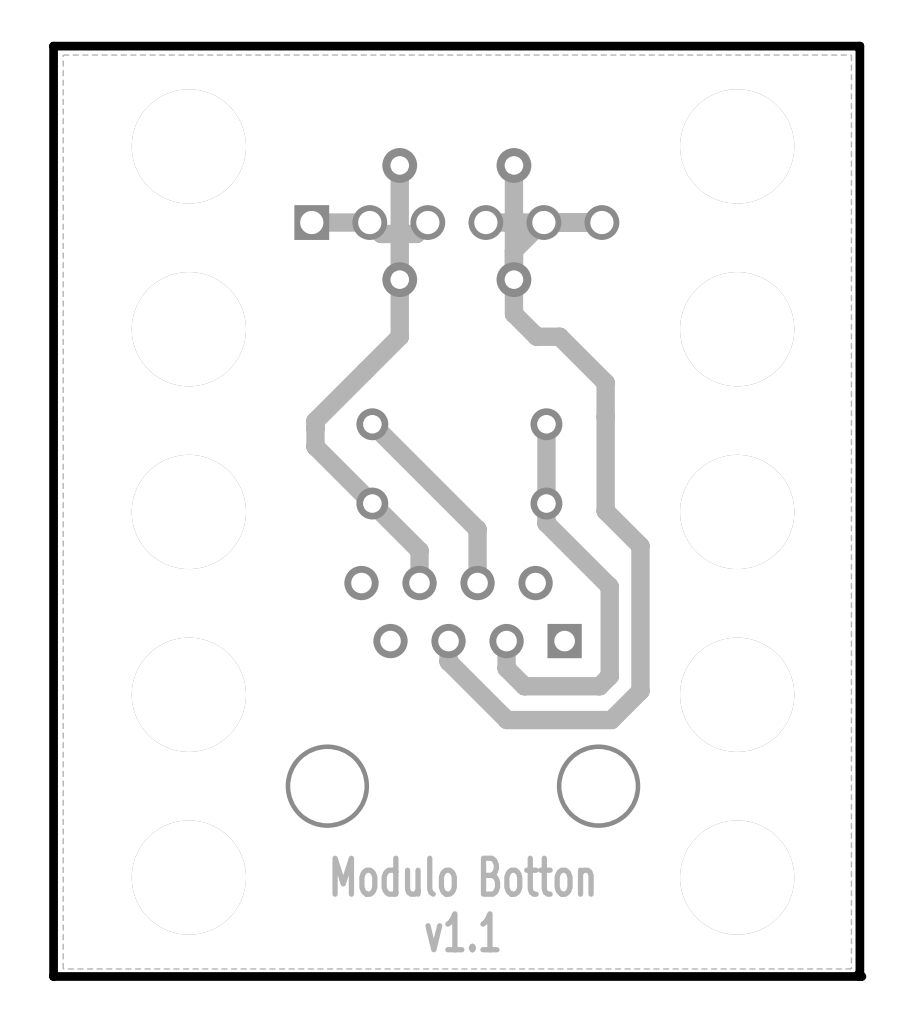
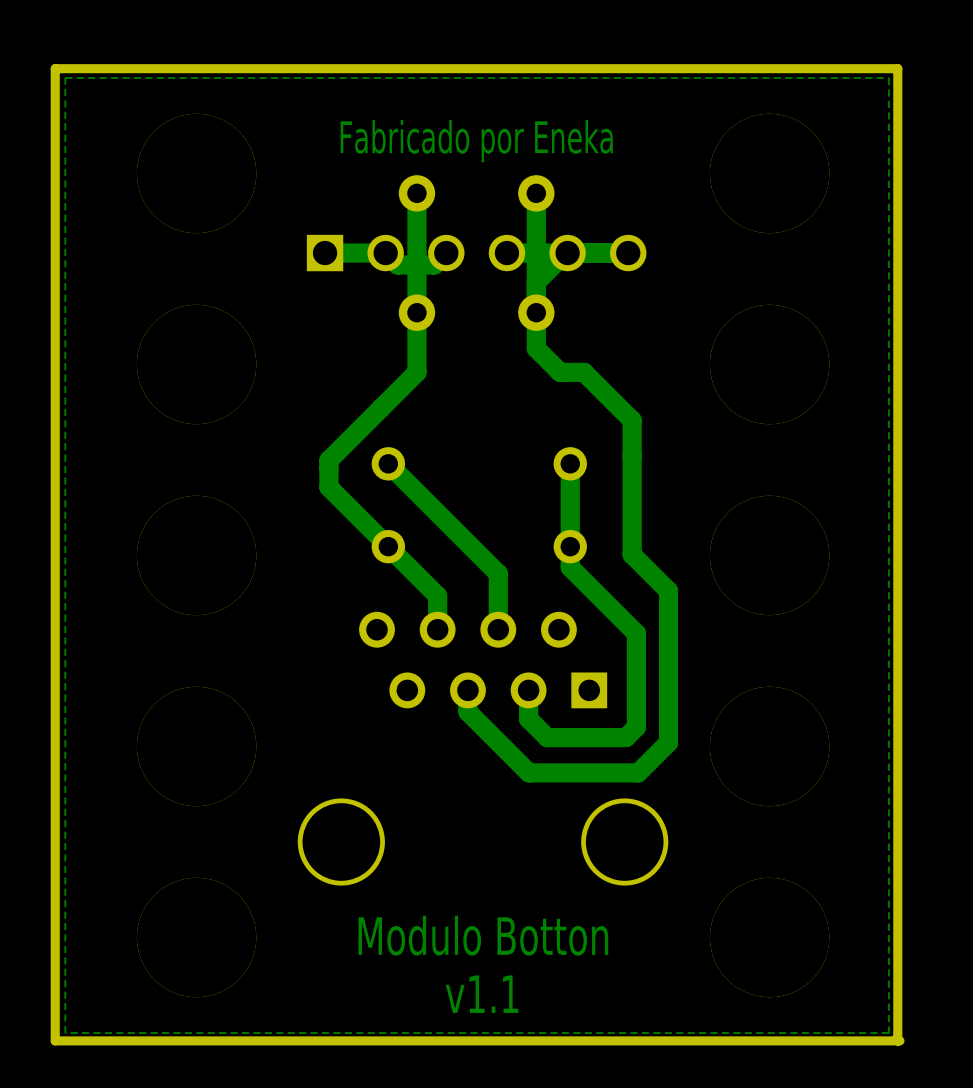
text: none -> Fabricado por Eneka (476, 141)

